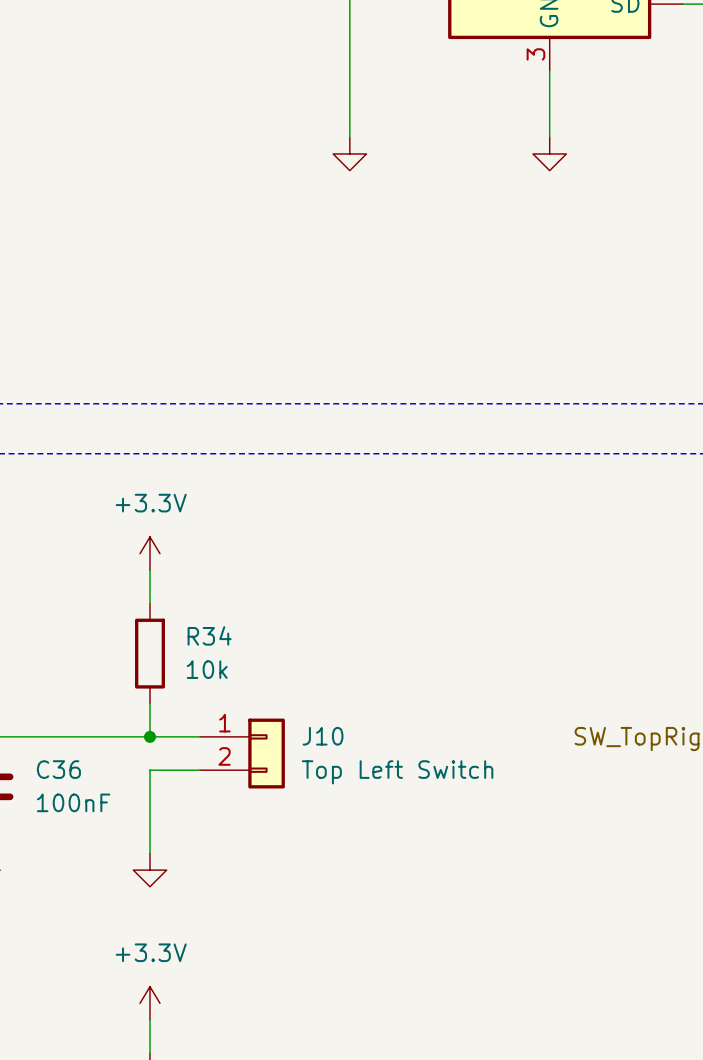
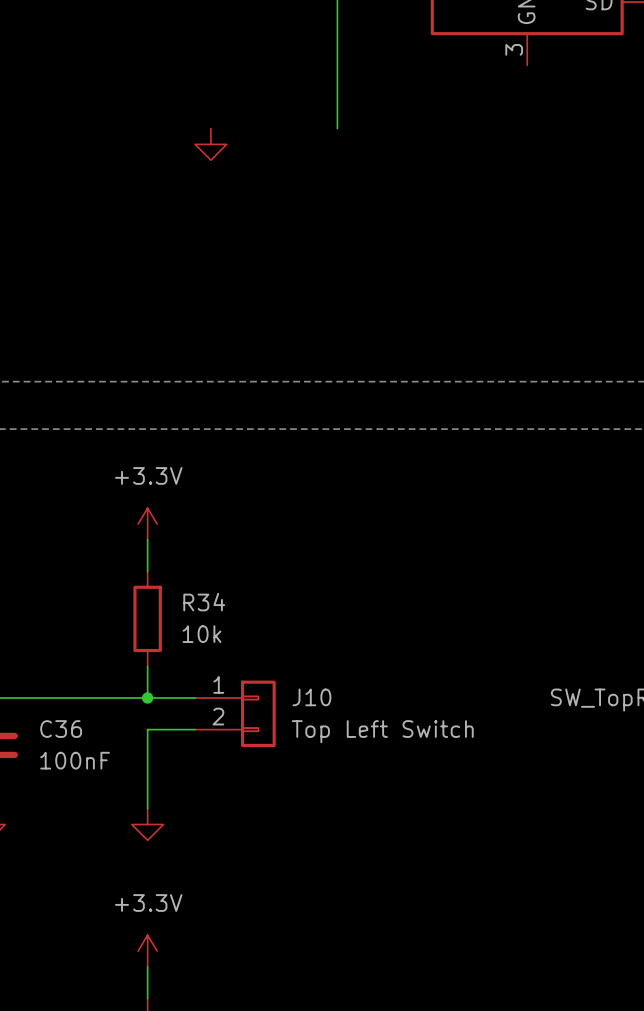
wire: (549, 70) (549, 137) -> none
power symbol position: (349, 153) -> (210, 144)
power symbol: (549, 153) -> none

